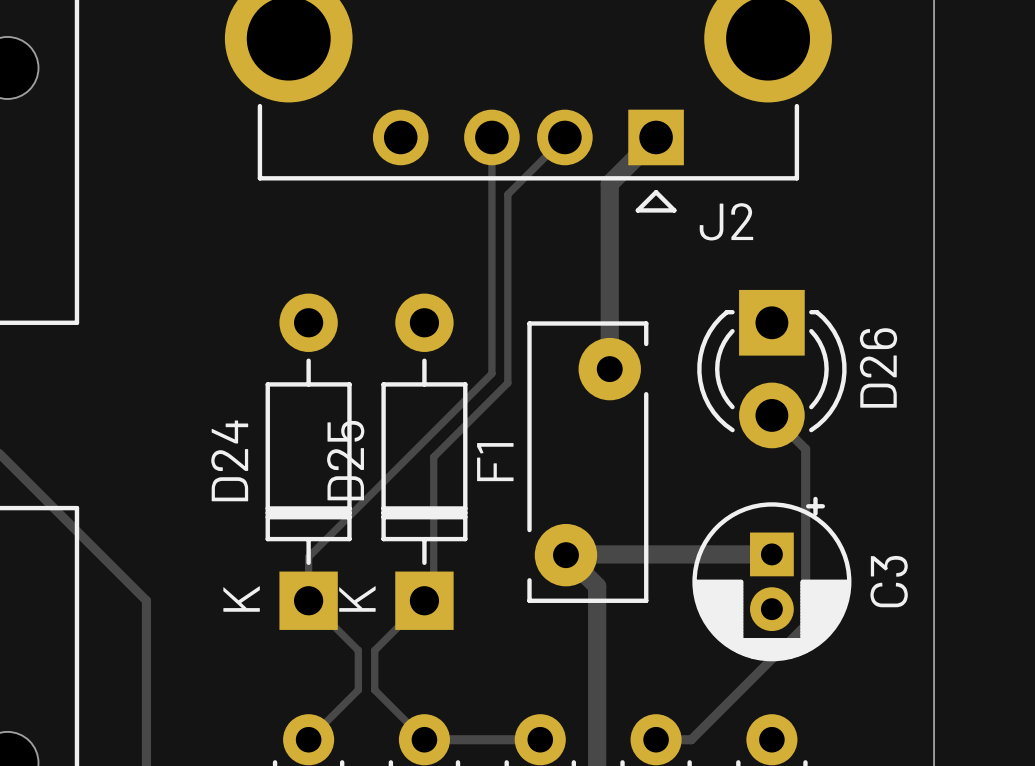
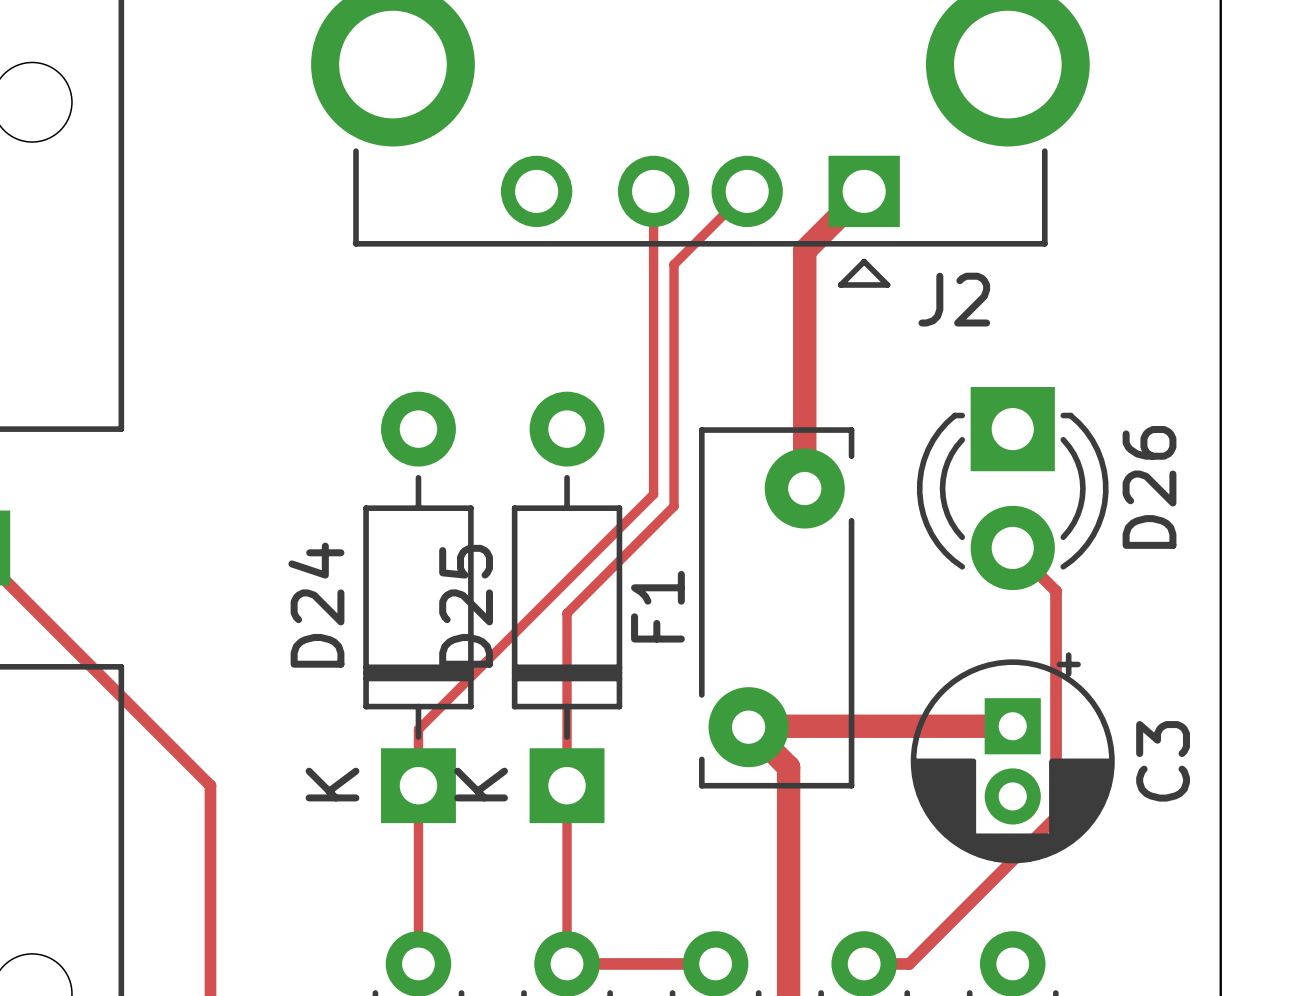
track: (433, 457) (433, 591) (374, 650) (374, 690) (424, 739) -> (578, 601) (567, 613) (567, 963)
track: (308, 600) (358, 650) (358, 690) (308, 739) -> (418, 785) (418, 963)

